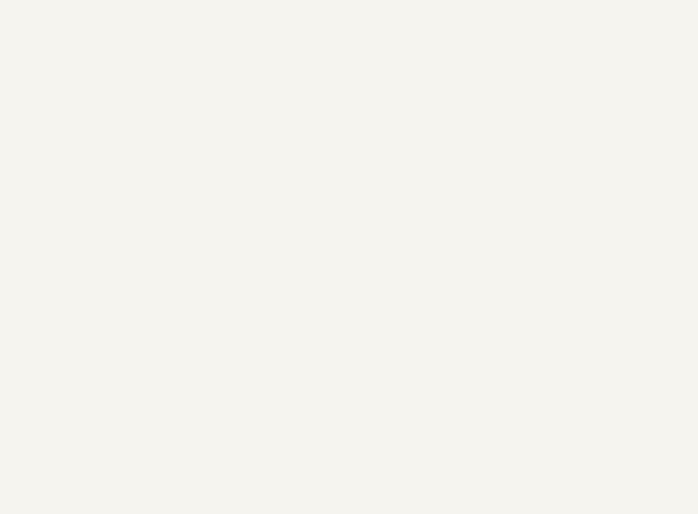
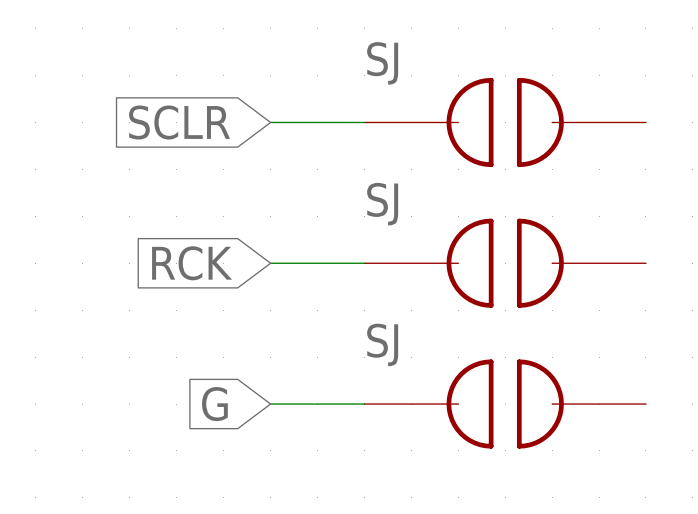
global label: none -> SCLR (179, 122)
wire: none -> (270, 122) (364, 122)
part: none -> (505, 122)
global label: none -> RCK (192, 263)
wire: none -> (270, 263) (364, 263)
part: none -> (505, 263)
global label: none -> G (214, 404)
wire: none -> (270, 404) (364, 404)
part: none -> (505, 404)

